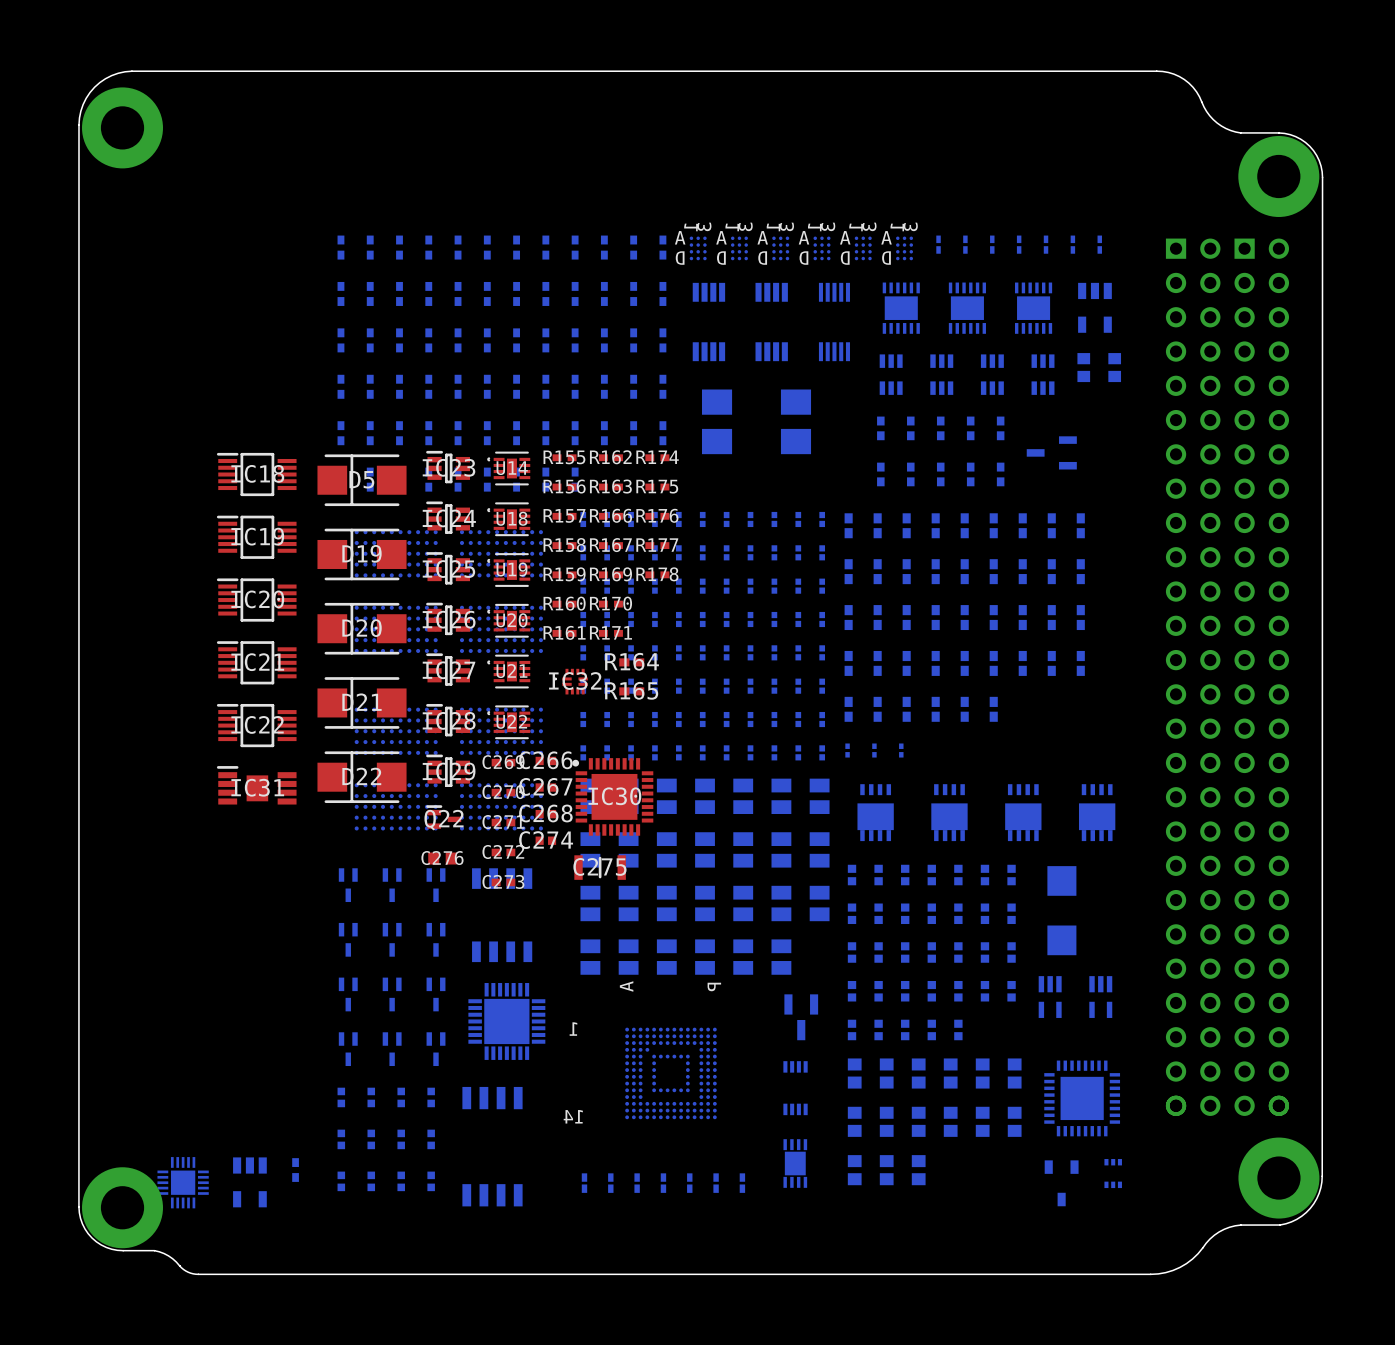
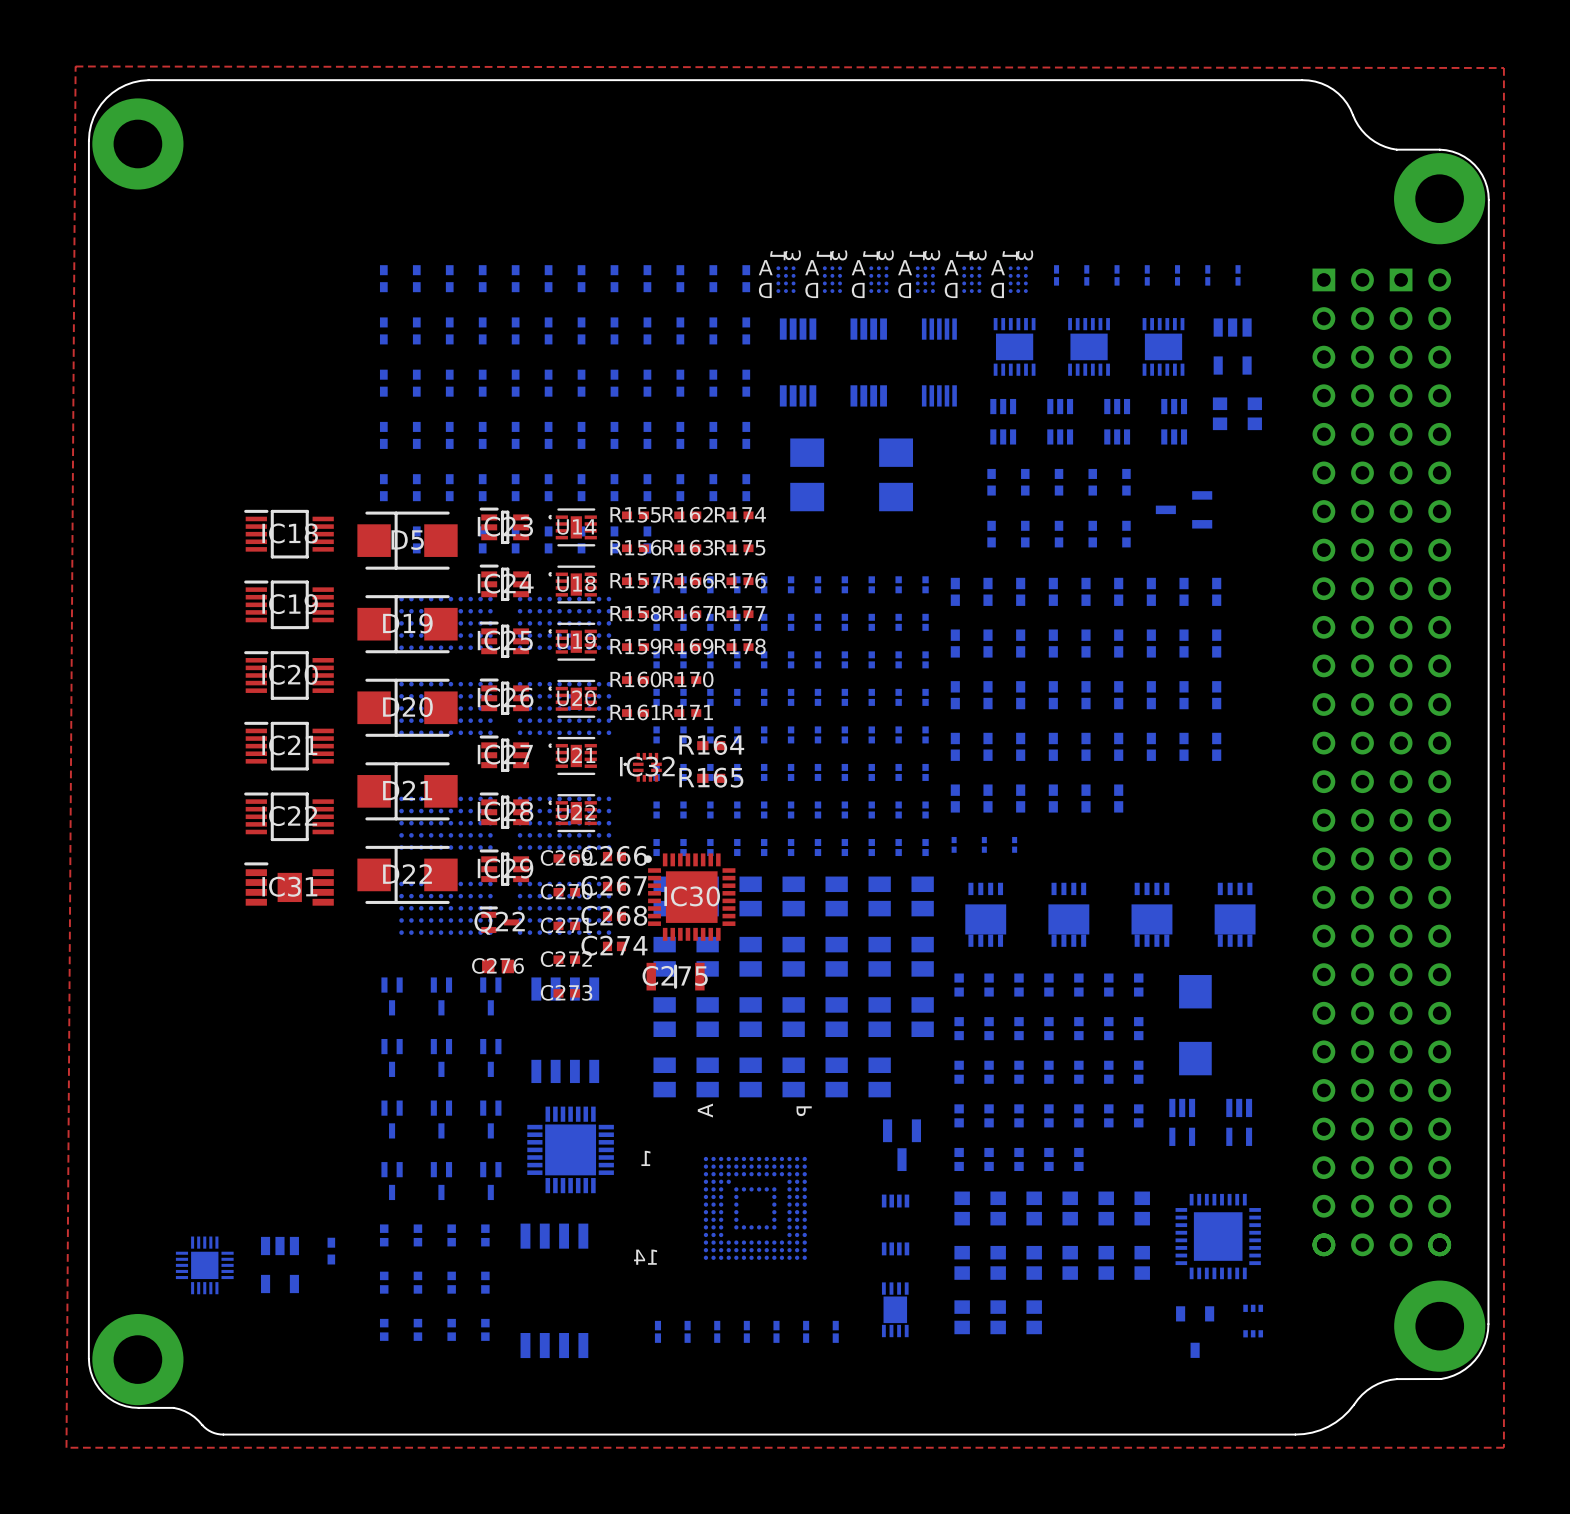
top zone outline: none -> (75, 66) (1503, 68) (1503, 1447) (66, 1447) (75, 66)
part position: (295, 1170) -> (331, 1251)
part position: (183, 1182) -> (204, 1265)
part position: (249, 1182) -> (279, 1265)

